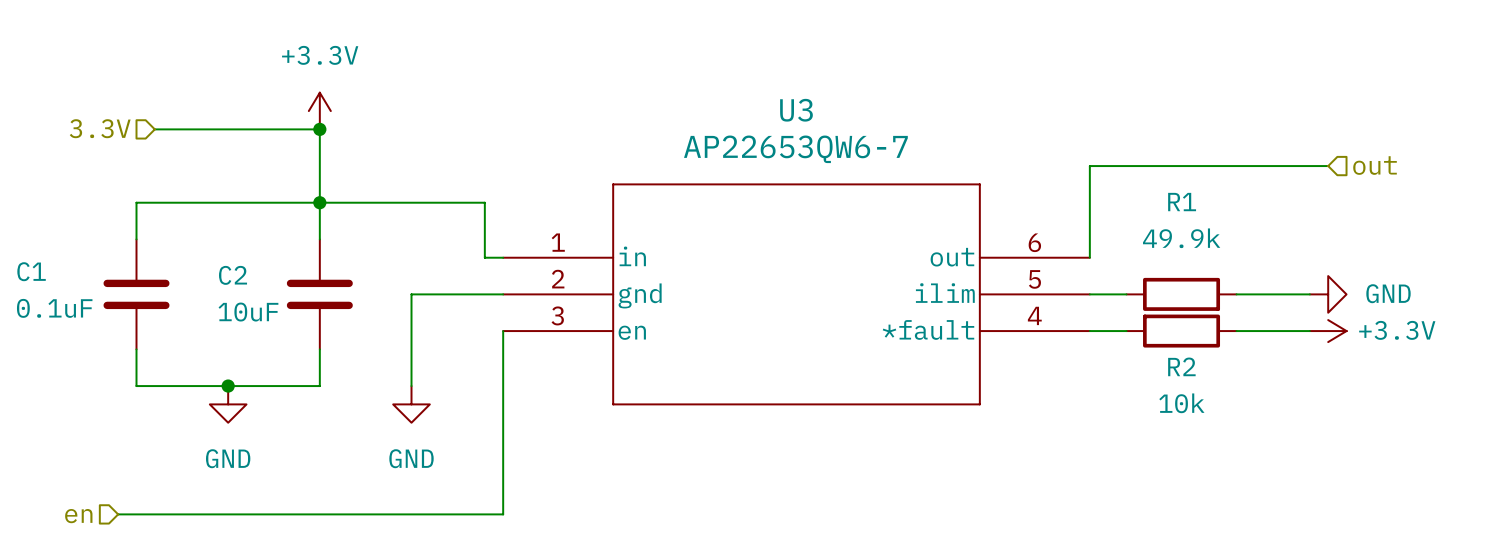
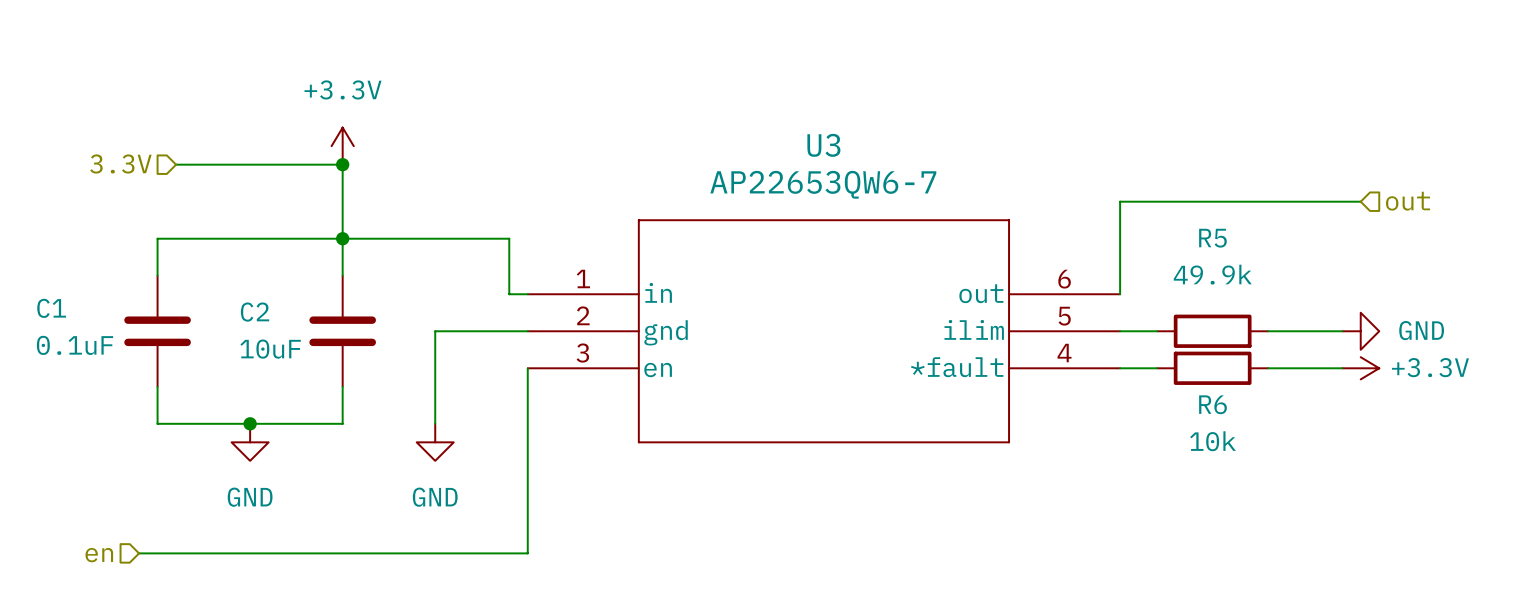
R1 name: R1 (1182, 202) -> R5 (1212, 238)
R2 name: R2 (1181, 366) -> R6 (1213, 404)

